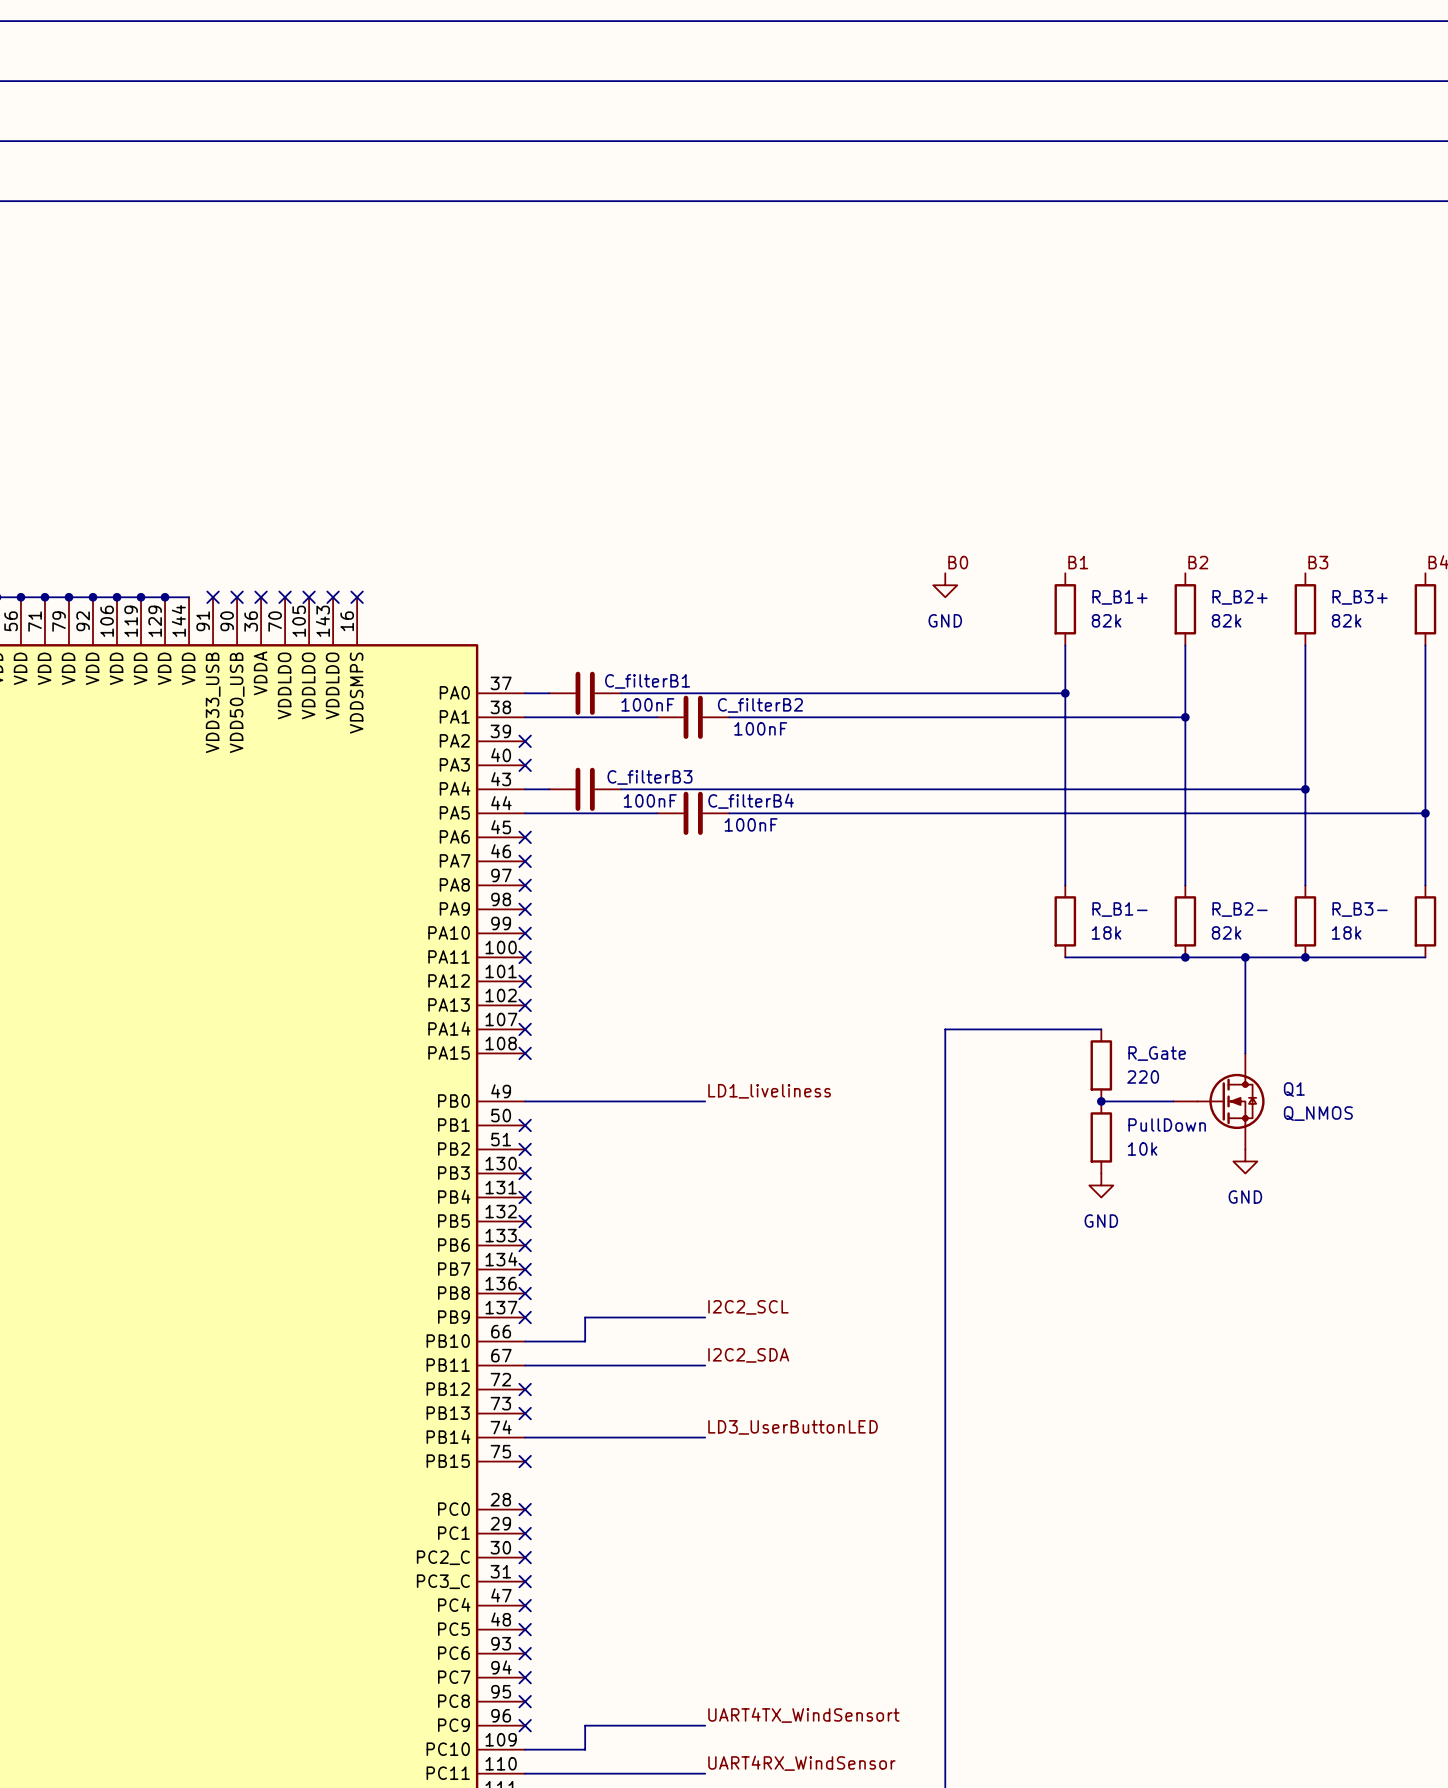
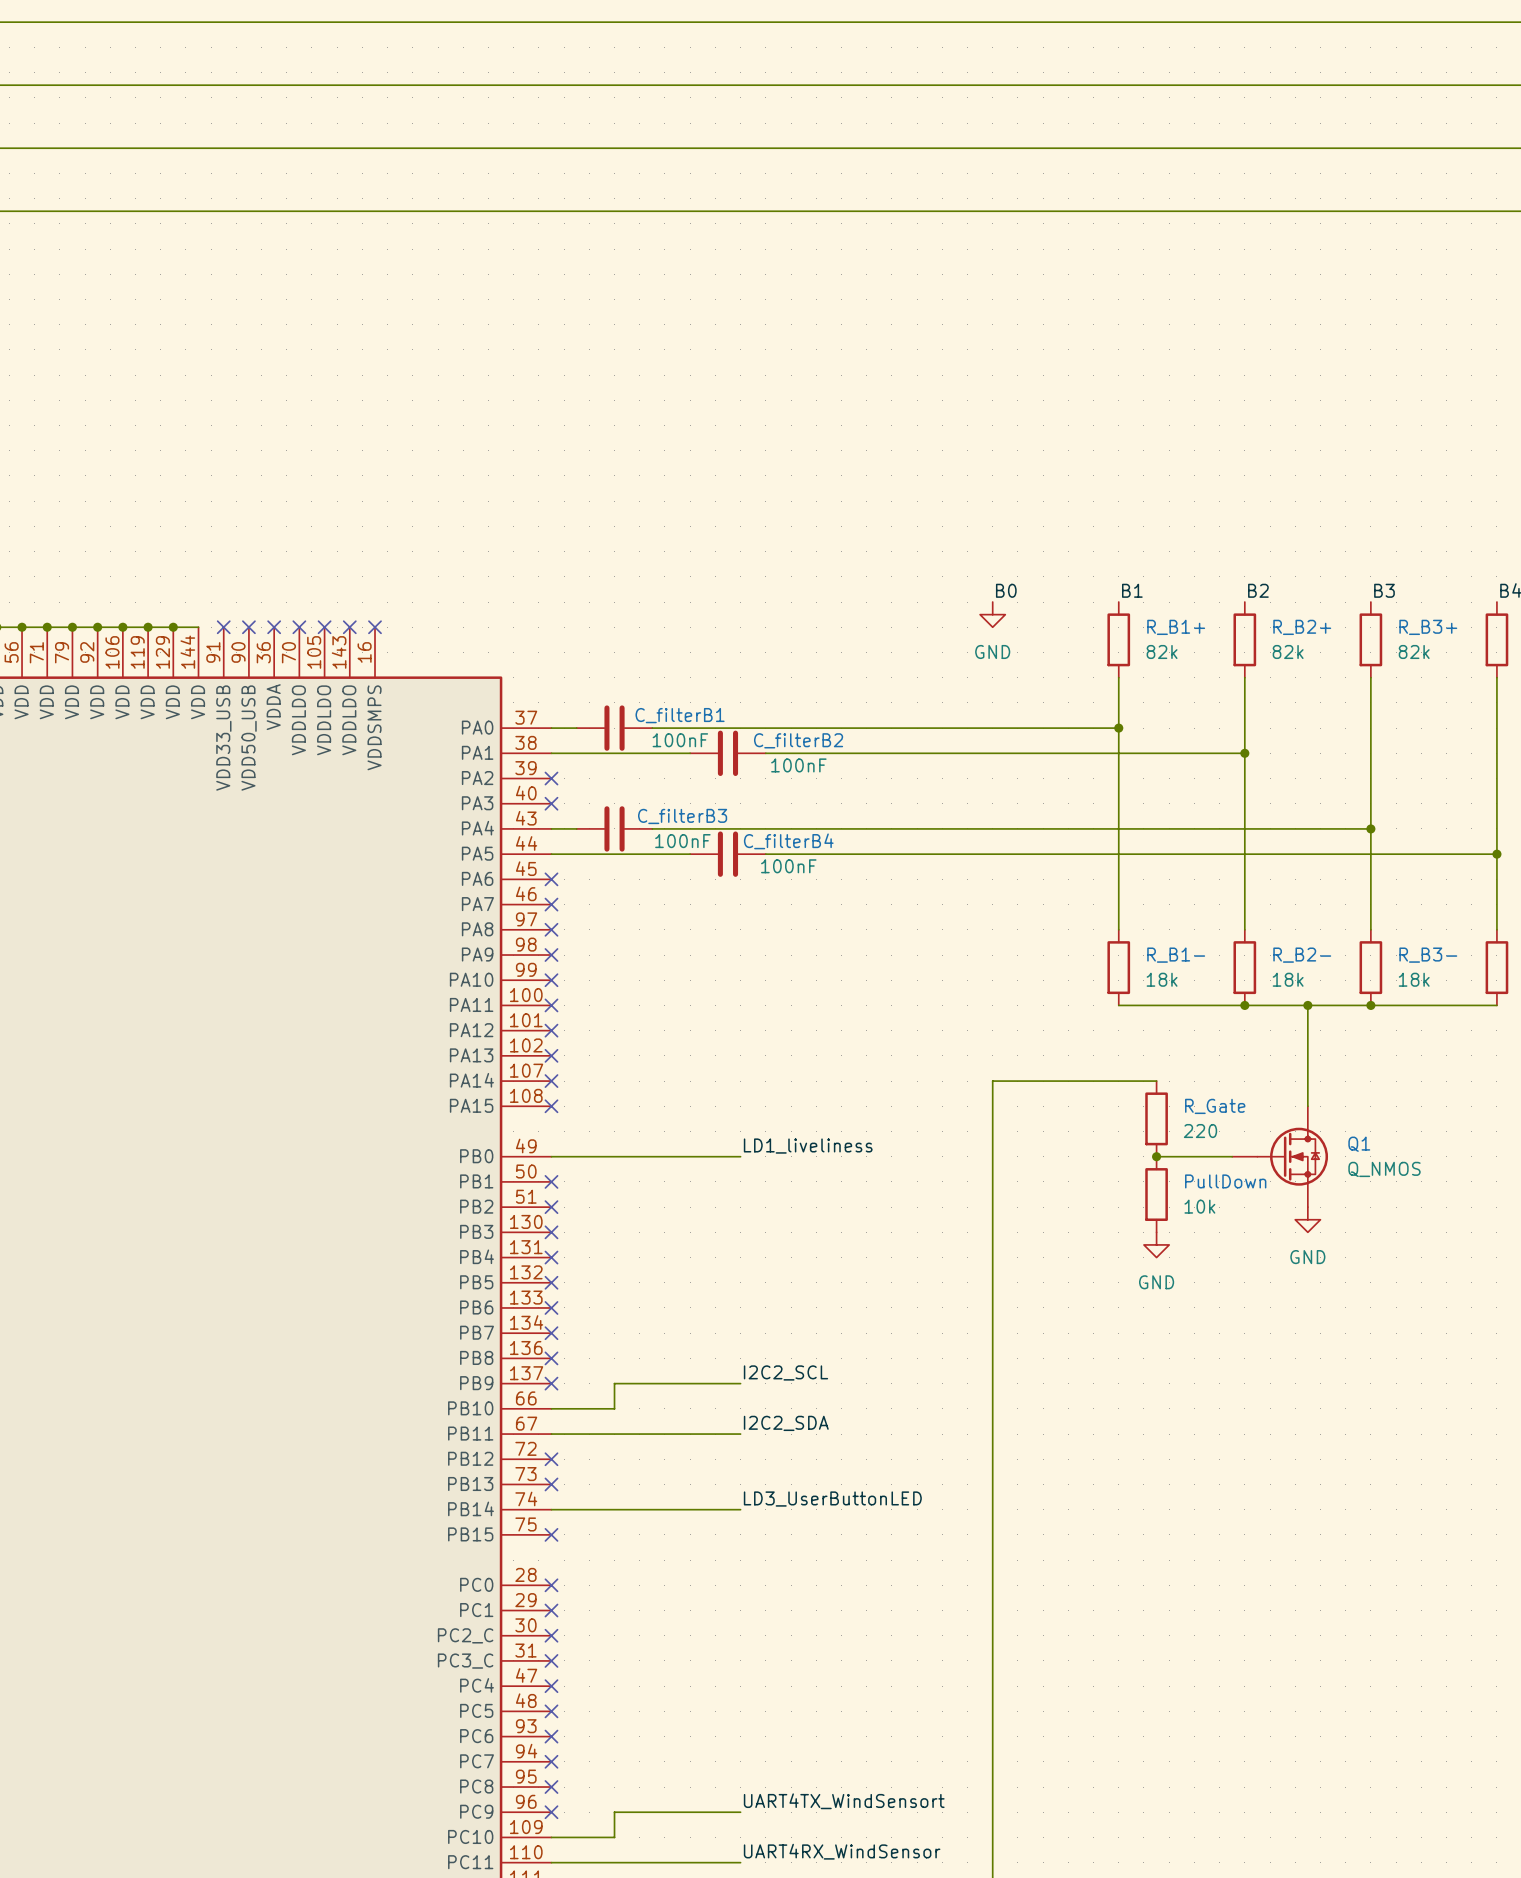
R_B2- value: 82k (1226, 932) -> 18k (1288, 979)

